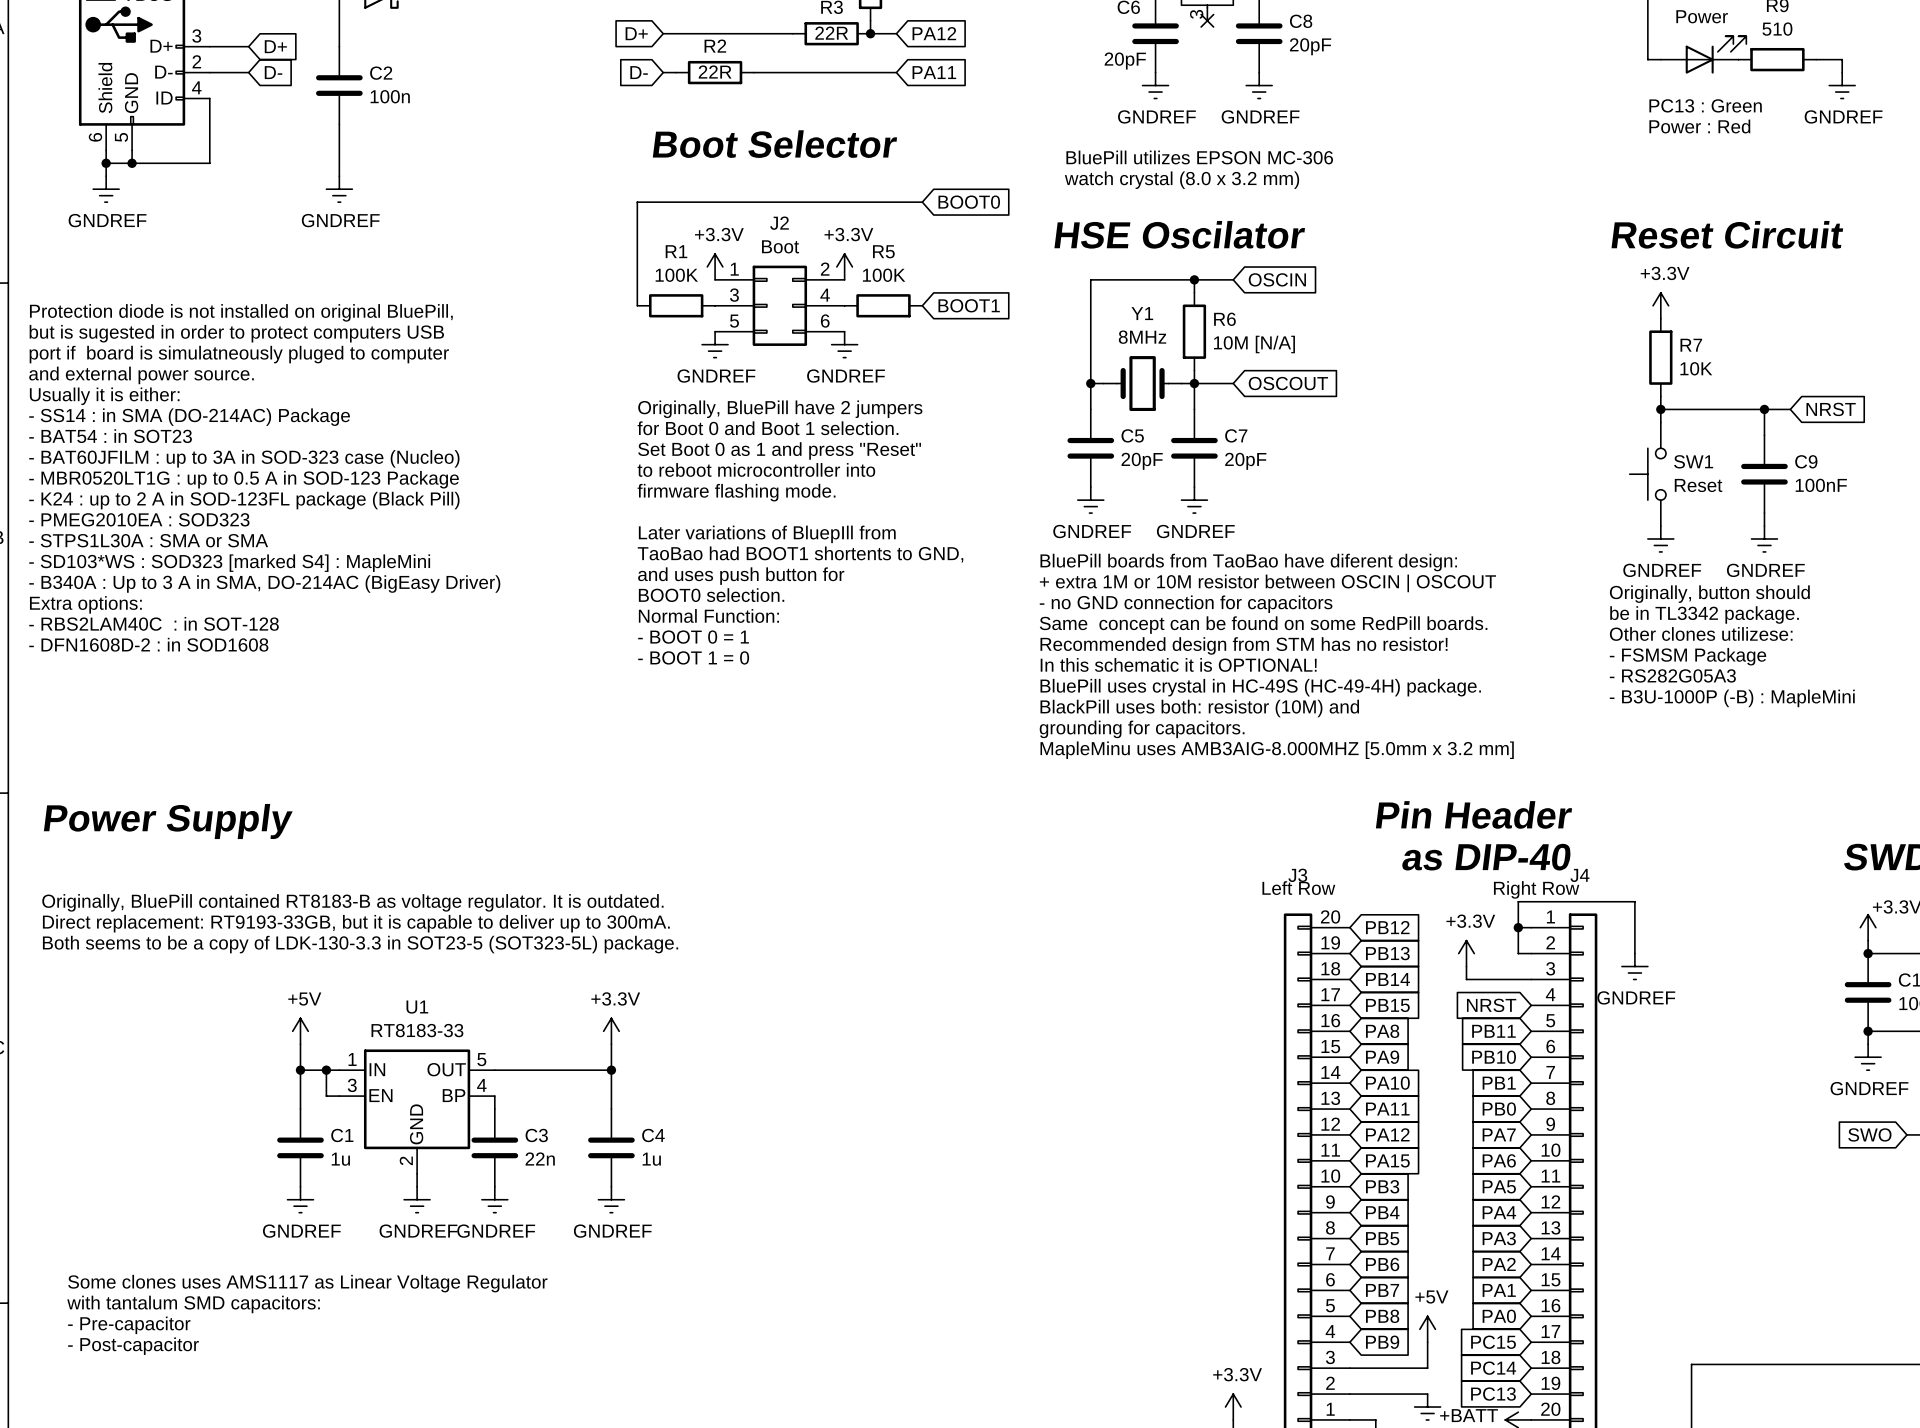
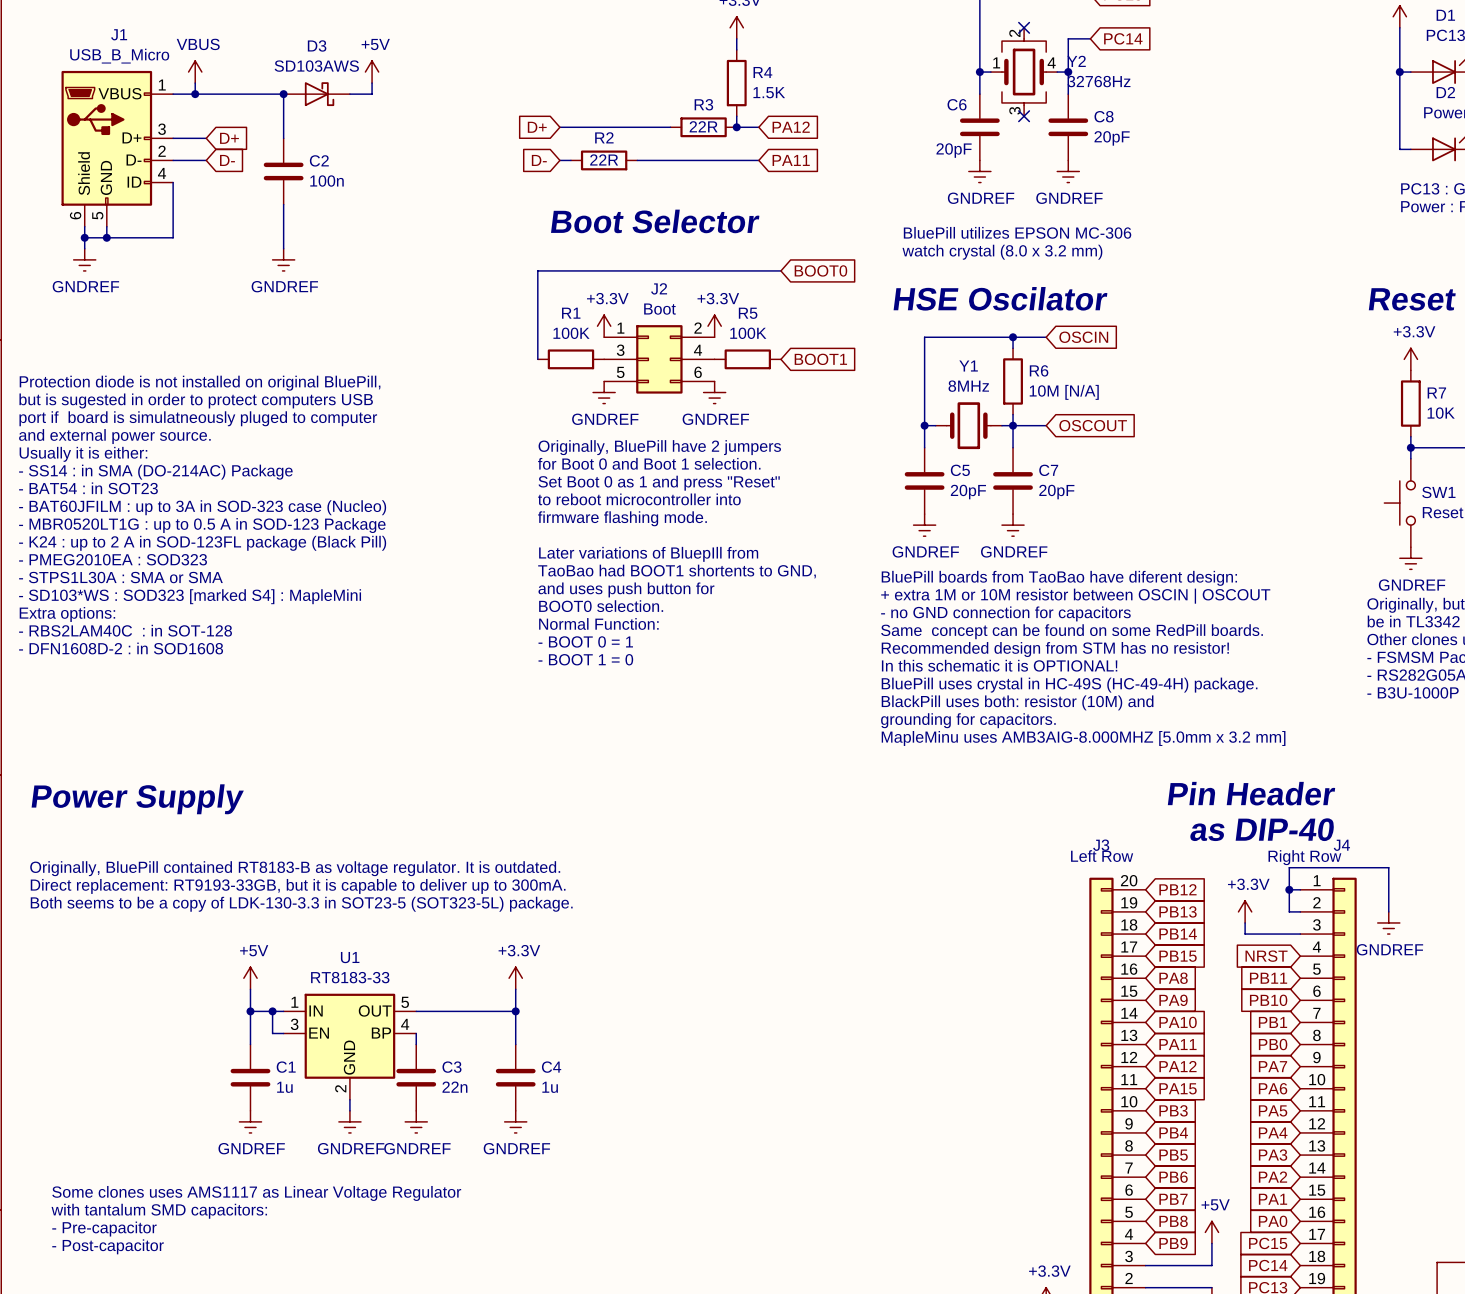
text: Protection diode is not installed on original BluePill, (241, 312) -> none
text: but is sugested in order to protect computers USB (236, 333) -> Protection diode is not installed on original BluePill, (200, 383)
text: port if board is simulatneously pluged to computer (239, 354) -> but is sugested in order to protect computers USB (196, 400)
text: and external power source. (141, 375) -> port if board is simulatneously pluged to computer (198, 418)
text: Usually it is either: (104, 396) -> and external power source. (114, 436)
text: - SS14 : in SMA (DO-214AC) Package (189, 417) -> Usually it is either: (83, 454)
text: - BAT54 : in SOT23 (110, 436) -> - SS14 : in SMA (DO-214AC) Package (155, 472)
text: - BAT60JFILM : up to 3A in SOD-323 case (Nucleo) (244, 458) -> - BAT54 : in SOT23 (88, 488)
text: - MBR0520LT1G : up to 0.5 A in SOD-123 Package (244, 479) -> - BAT60JFILM : up to 3A in SOD-323 case (Nucleo) (202, 507)
text: - K24 : up to 2 A in SOD-123FL package (Black Pill) (244, 500) -> - MBR0520LT1G : up to 0.5 A in SOD-123 Package (202, 525)
text: - PMEG2010EA : SOD323 (139, 519) -> - K24 : up to 2 A in SOD-123FL package (Black Pill) (202, 543)
text: - STPS1L30A : SMA or SMA (148, 540) -> - PMEG2010EA : SOD323 (113, 559)
text: - SD103*WS : SOD323 [marked S4] : MapleMini (229, 563) -> - STPS1L30A : SMA or SMA (120, 577)
text: - B340A : Up to 3 A in SMA, DO-214AC (BigEasy Driver) (264, 584) -> - SD103*WS : SOD323 [marked S4] : MapleMini (190, 596)

